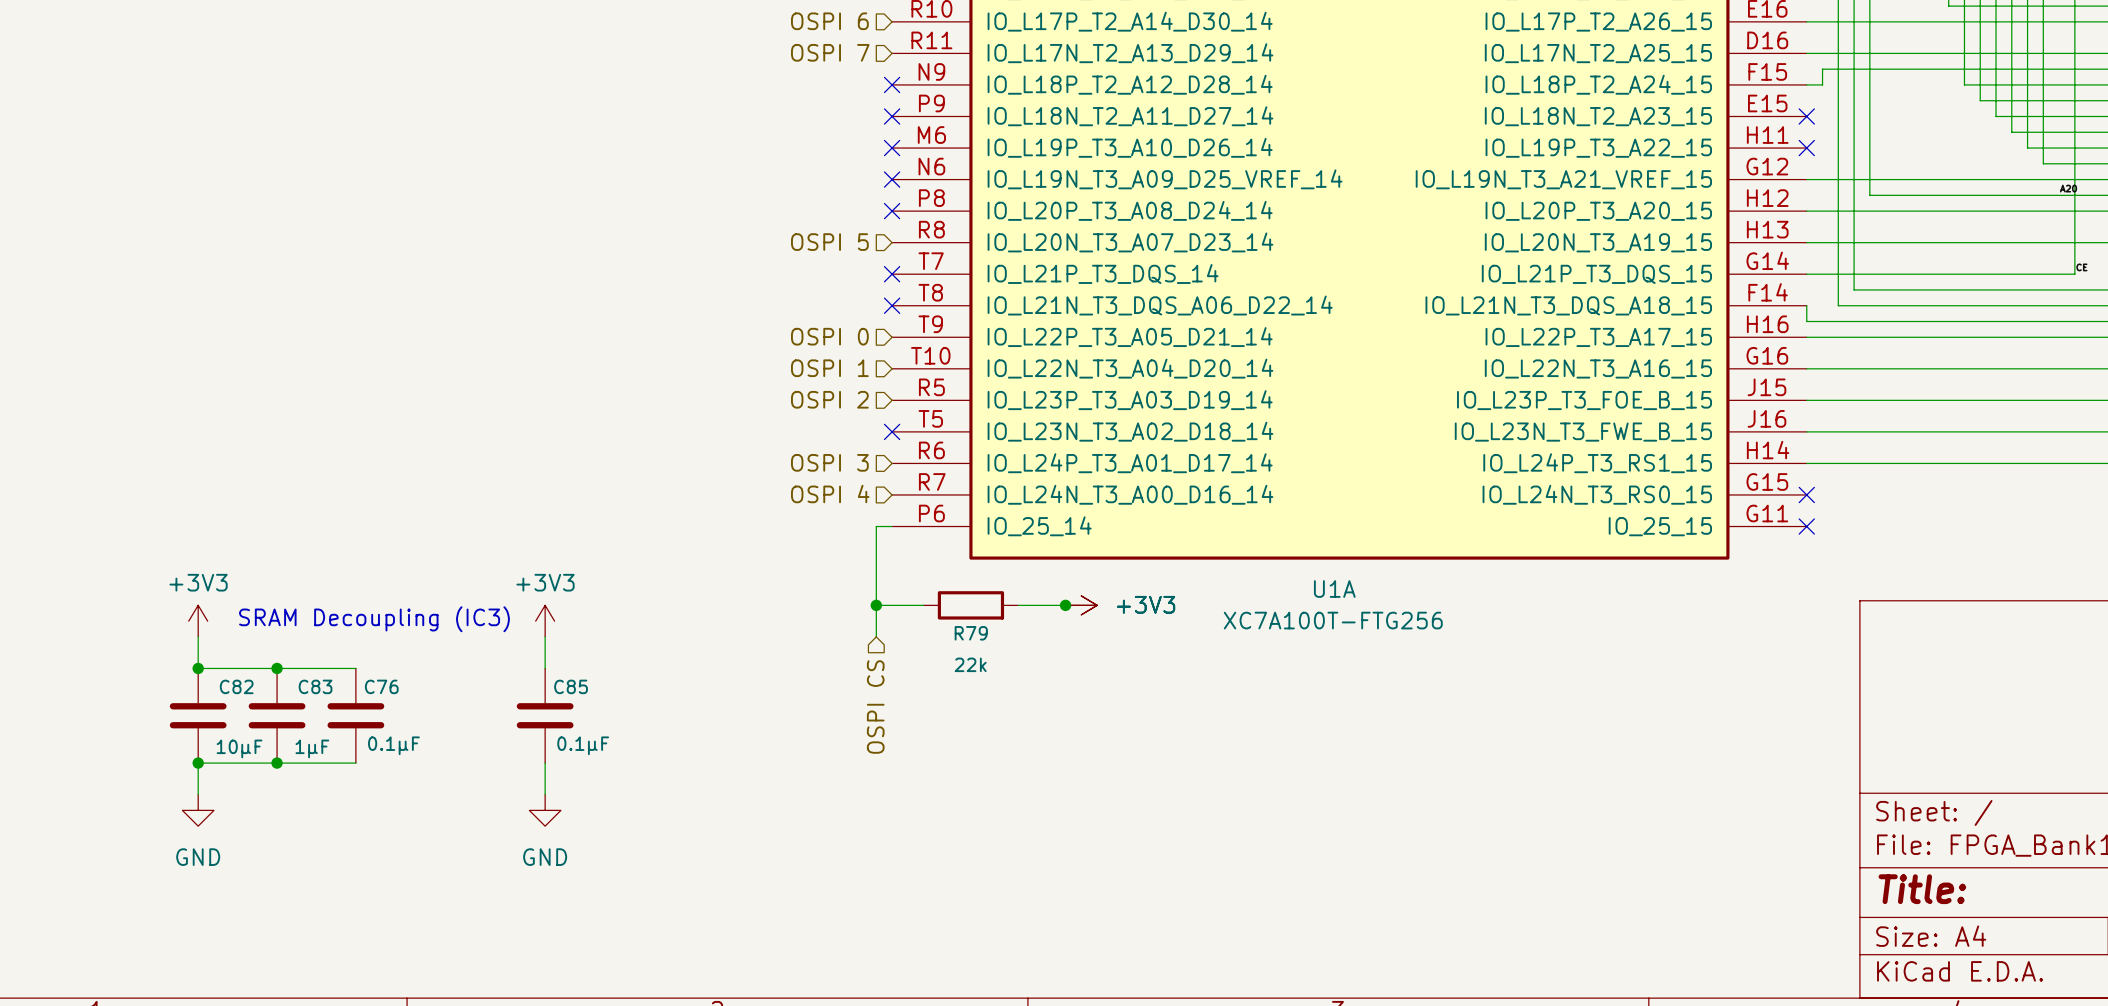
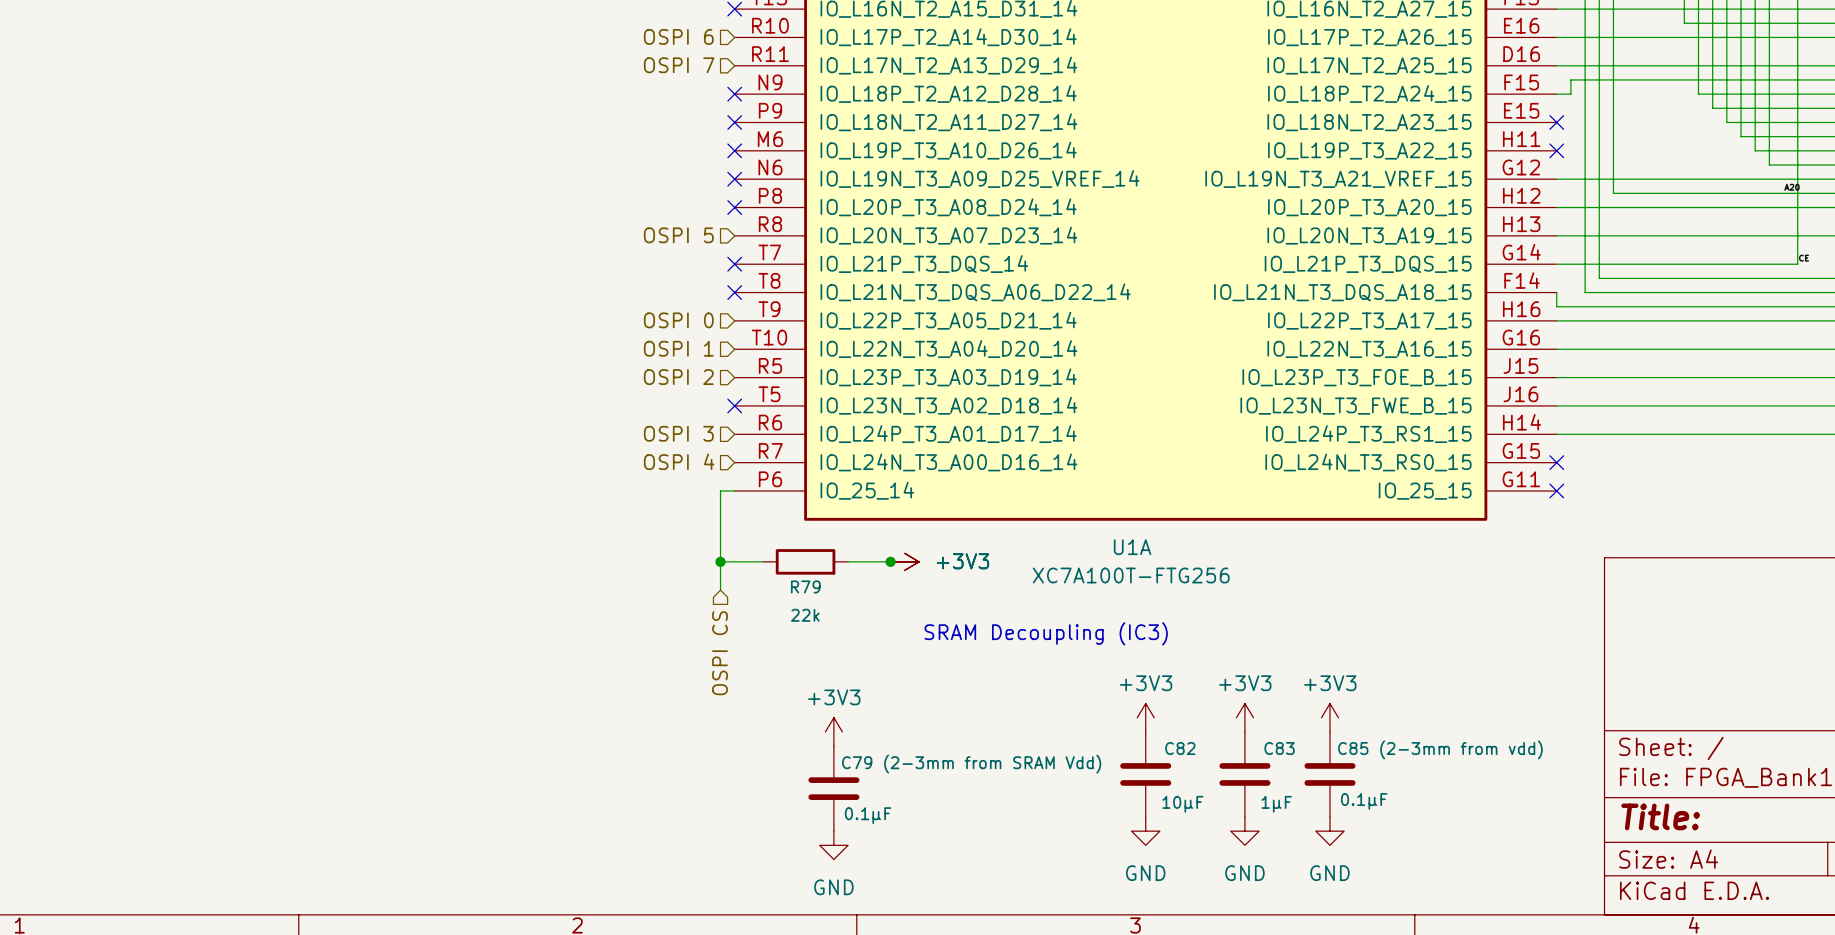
text: SRAM Decoupling (IC3) (374, 619) -> none
power symbol: +3V3 (198, 621) -> none
power symbol: +3V3 (545, 621) -> none
wire: (198, 636) (198, 668) (355, 668) -> none
wire: (545, 636) (545, 668) -> none
junction: (198, 668) -> none
junction: (277, 668) -> none
text: none -> SRAM Decoupling (IC3) (1046, 633)
C82 position: (198, 715) -> (1145, 774)
C83 position: (277, 715) -> (1244, 774)
C76: 0.1µF (355, 715) -> none
C85: 0.1µF (545, 715) -> none
junction: (198, 763) -> none
junction: (277, 763) -> none
wire: (355, 763) (198, 763) (198, 794) -> none
wire: (545, 763) (545, 794) -> none
power symbol: none -> +3V3 (1145, 717)
power symbol: none -> +3V3 (1244, 717)
power symbol: none -> +3V3 (1329, 717)
power symbol: none -> +3V3 (833, 731)
power symbol: GND (198, 810) -> none
power symbol: GND (545, 810) -> none
C85 (2-3mm from vdd): none -> 0.1µF (1329, 774)
C79 (2-3mm from SRAM Vdd): none -> 0.1µF (833, 788)
power symbol: none -> GND (1145, 831)
power symbol: none -> GND (1244, 831)
power symbol: none -> GND (1329, 831)
power symbol: none -> GND (833, 845)

